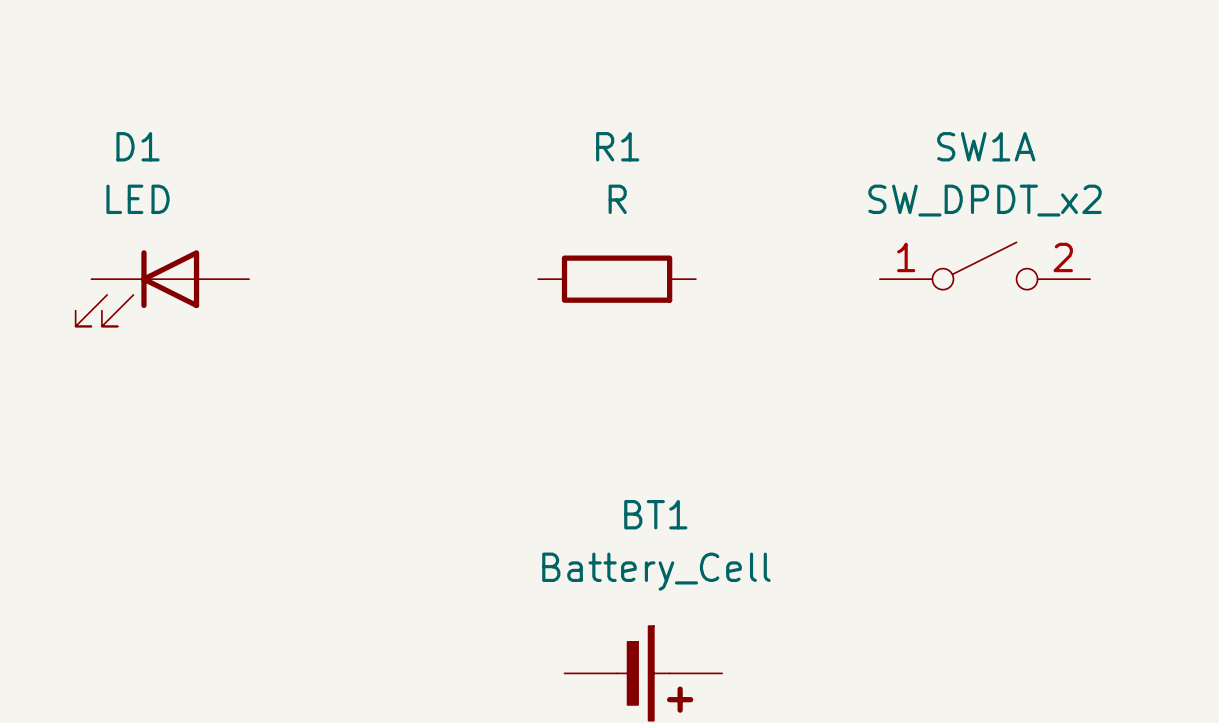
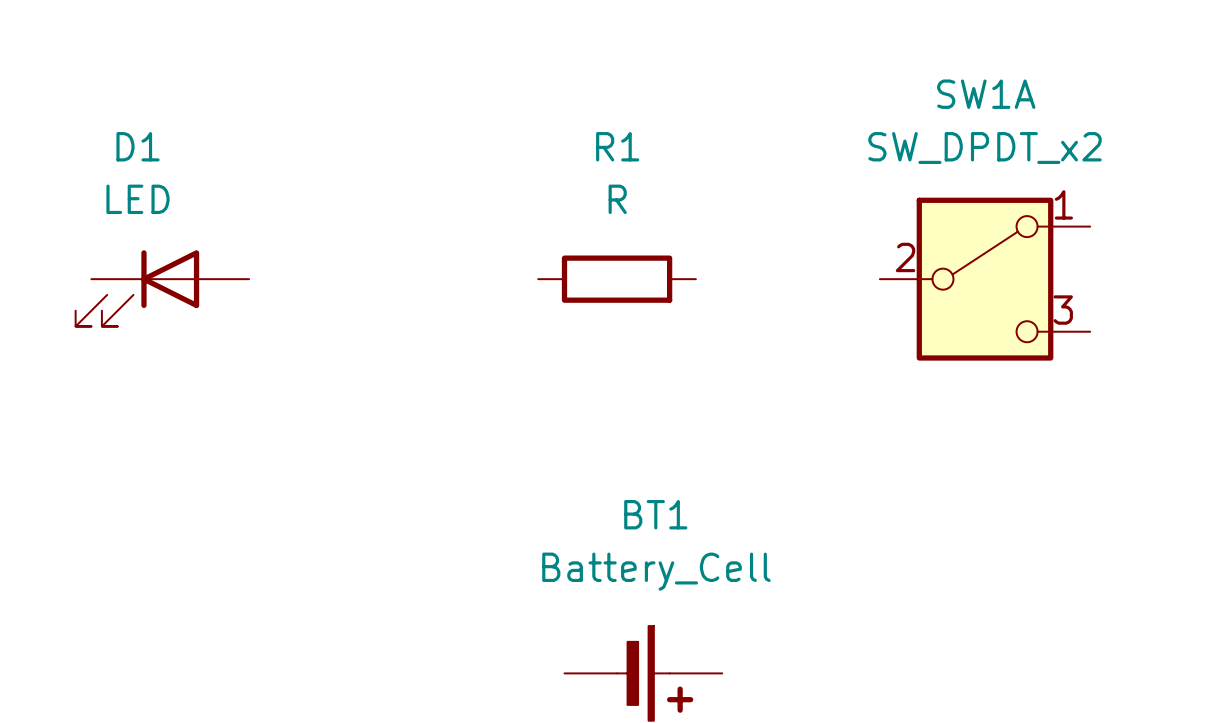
SW1A name position: SW1A (986, 146) -> SW1A (986, 94)
SW1A value position: SW_DPDT_x2 (985, 200) -> SW_DPDT_x2 (985, 148)
SW1A symbol: [879, 242, 1091, 290] -> [879, 197, 1091, 361]

